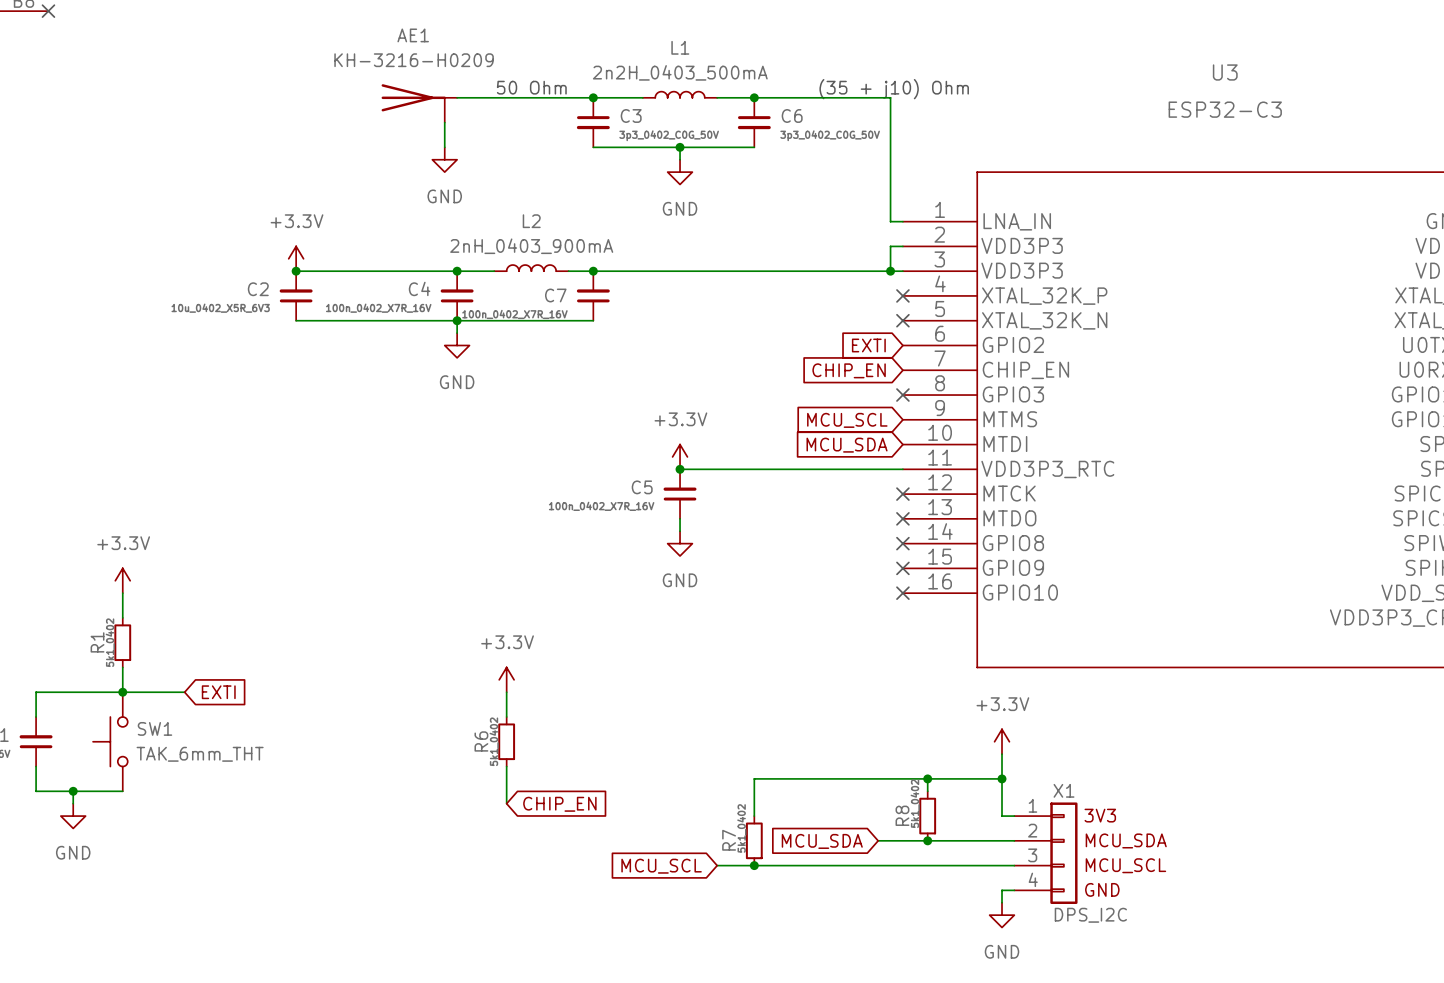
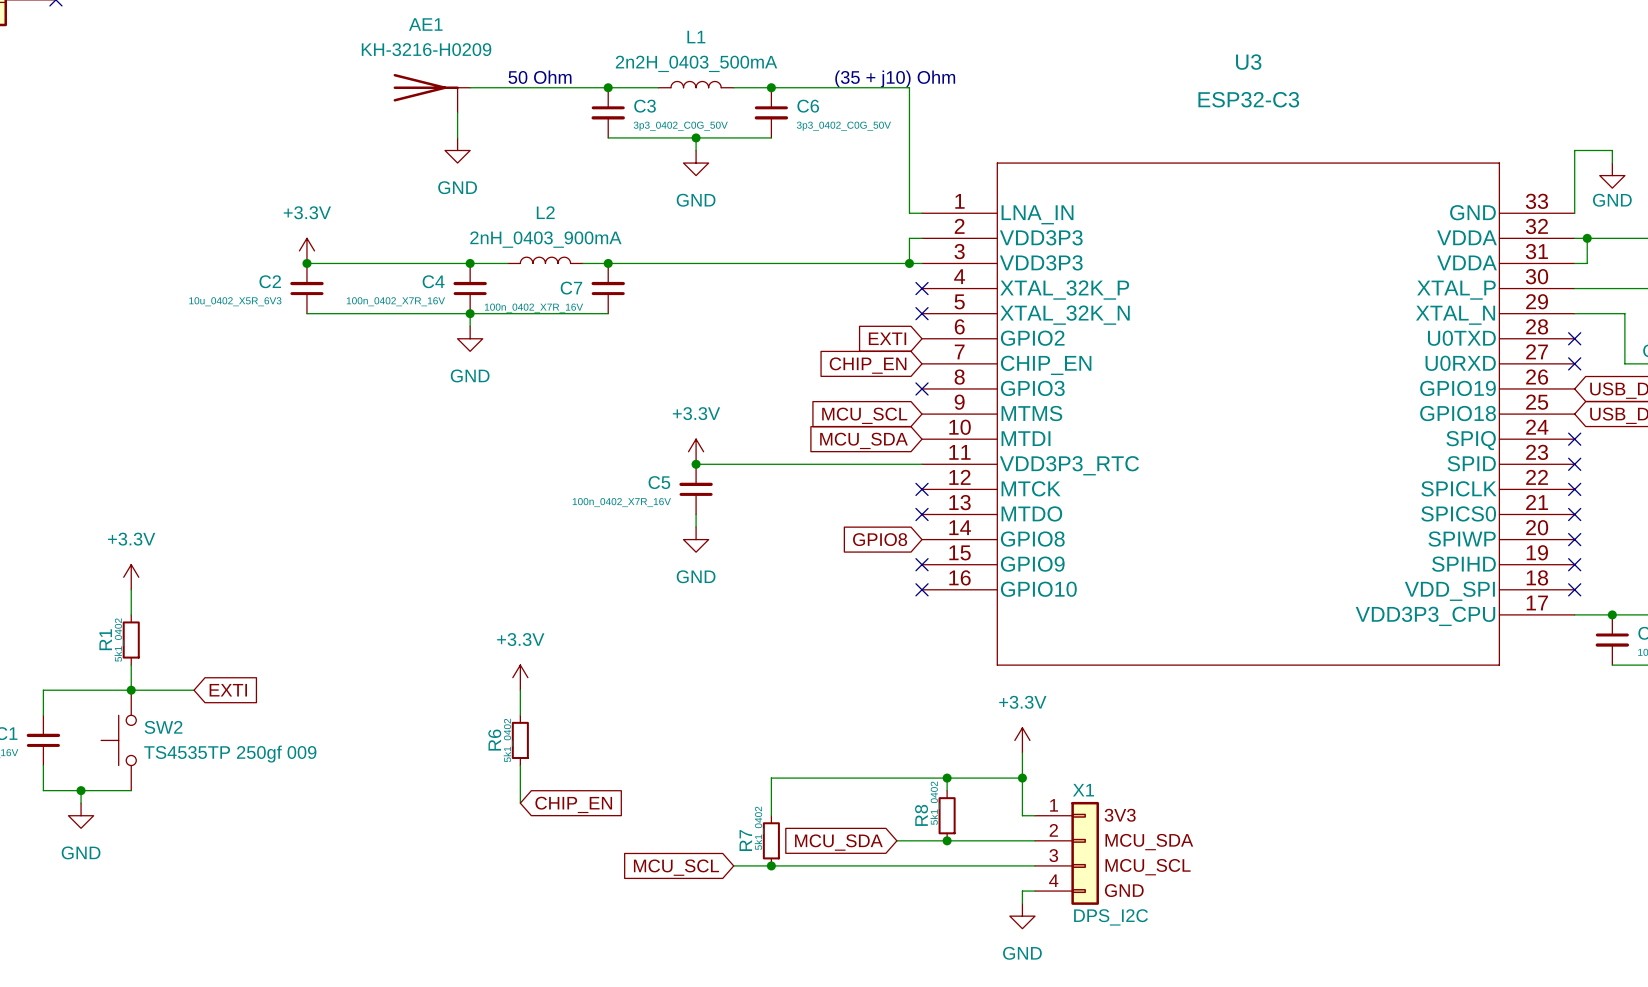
global label: none -> GPIO8 (880, 539)
no-connect mark: (902, 543) -> none
SW1 name: SW1 (154, 728) -> SW2 (163, 727)
SW1 value: TAK_6mm_THT (200, 754) -> TS4535TP 250gf 009 (230, 754)

